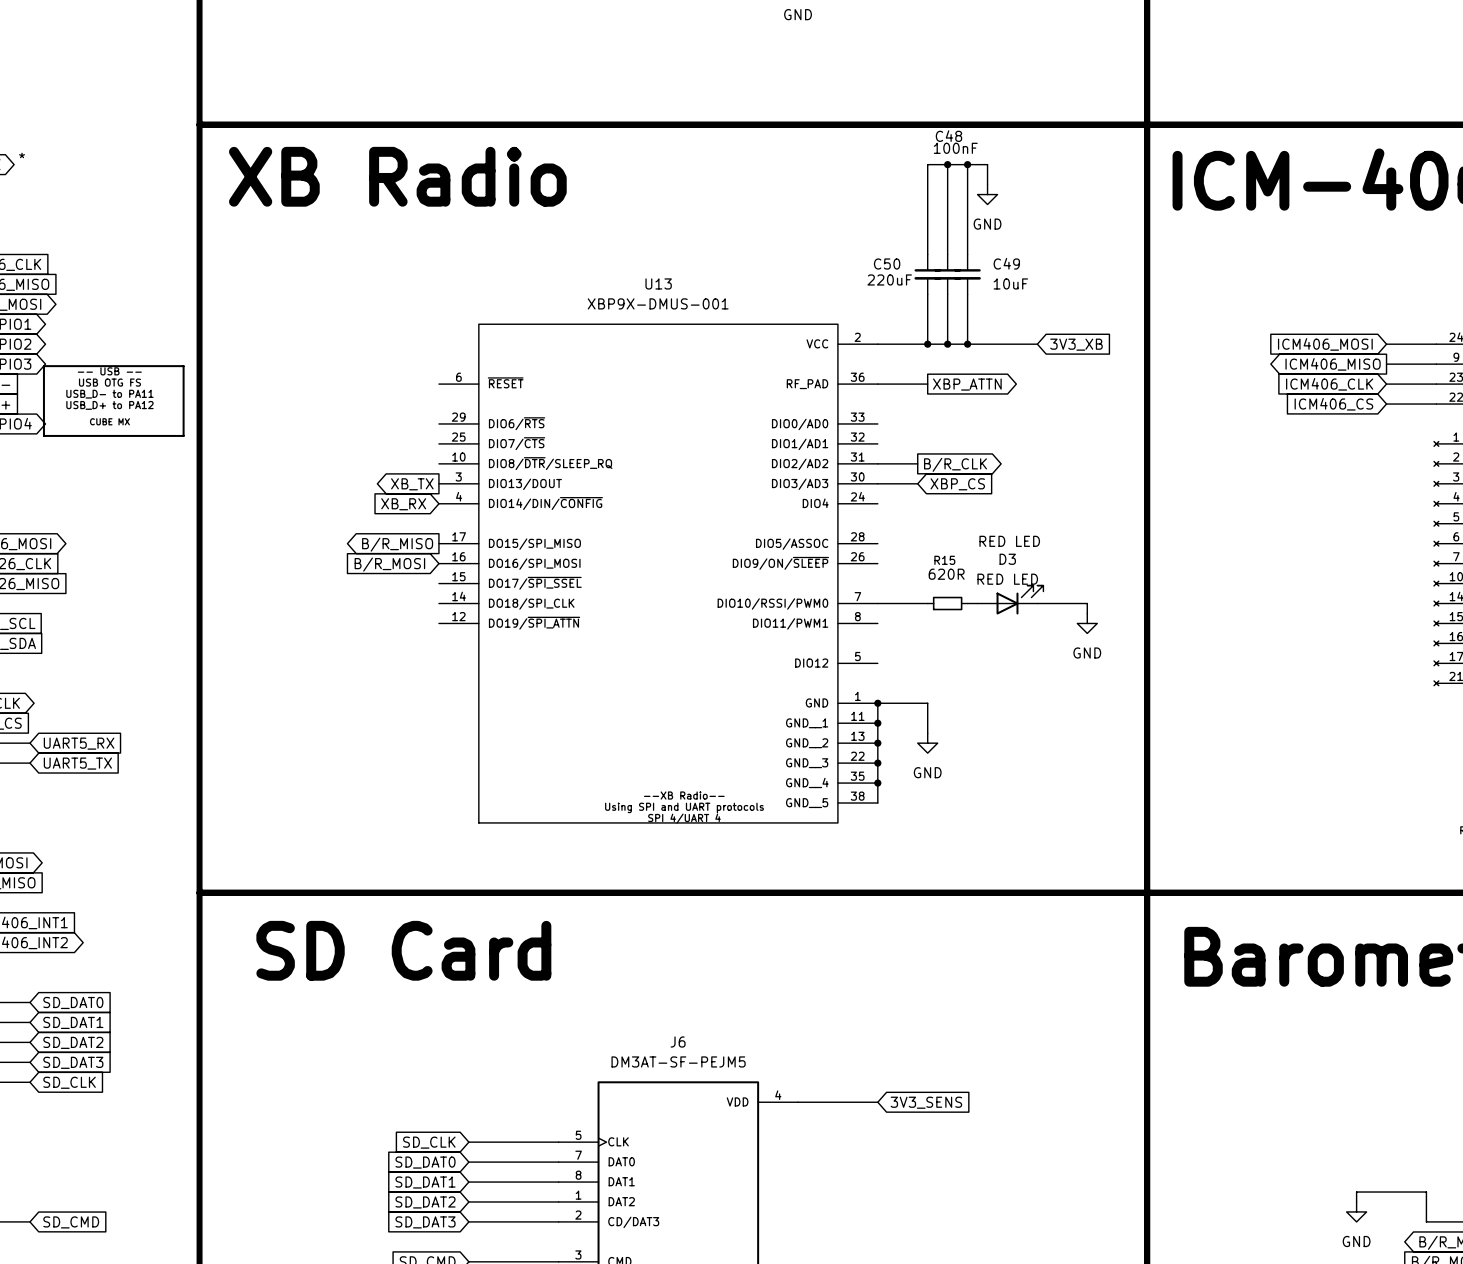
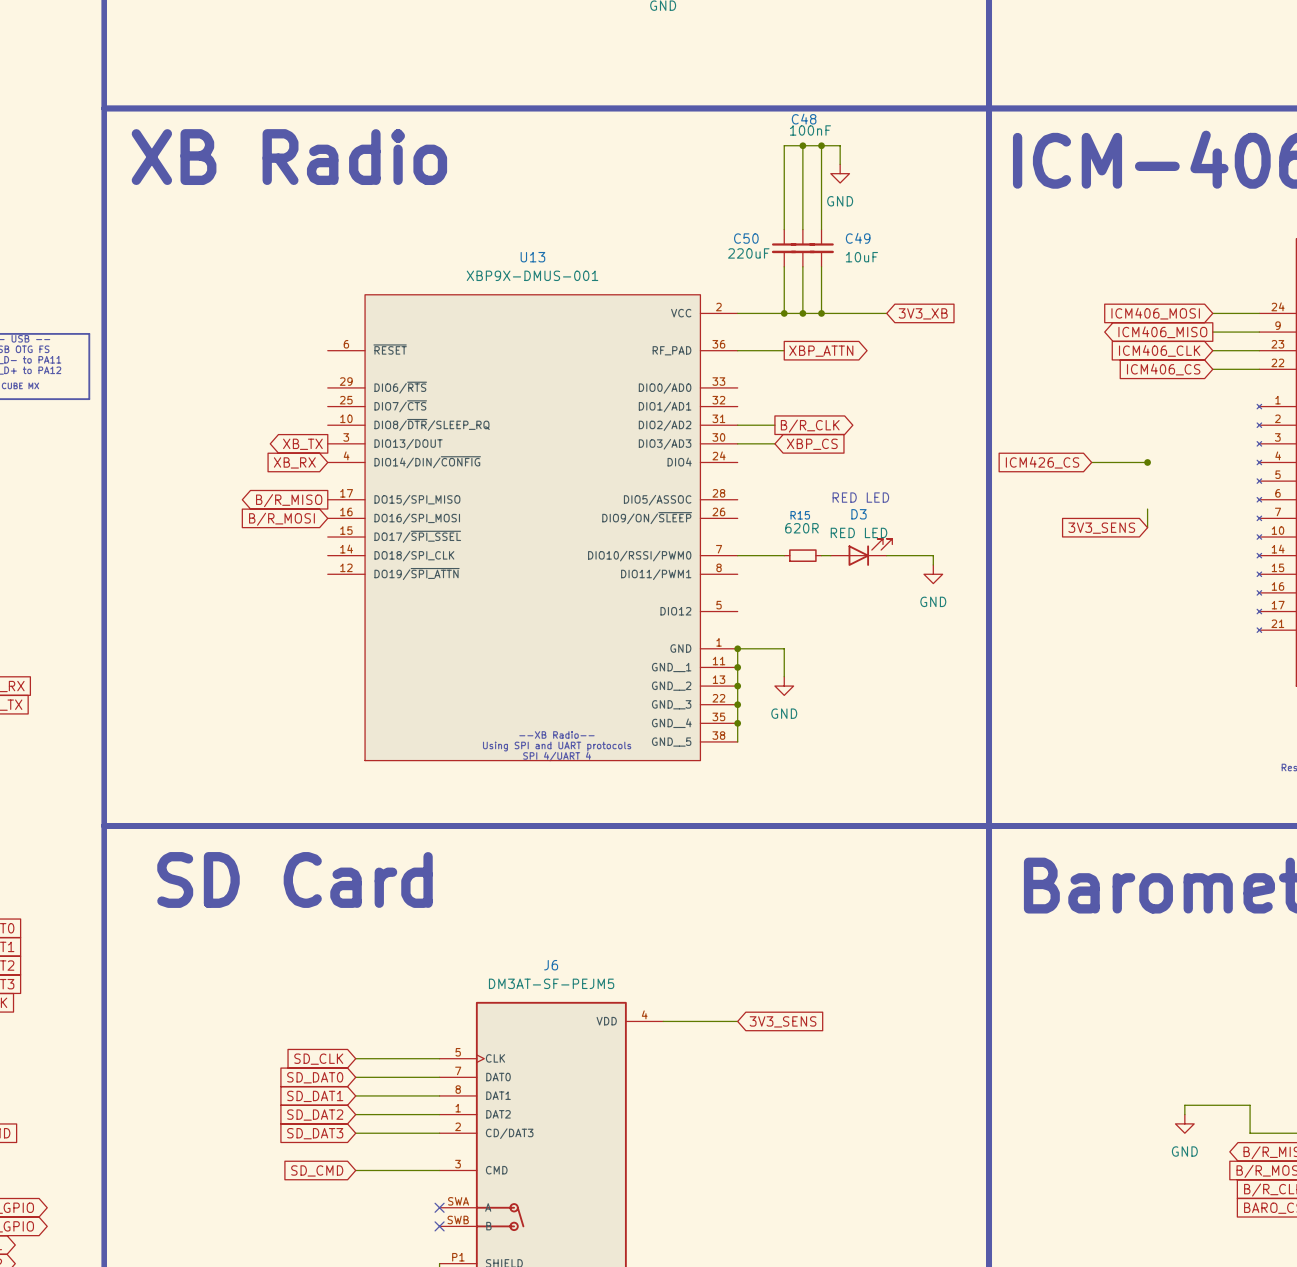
wire: none -> (1091, 462) (1147, 462)
junction: none -> (1147, 462)
global label: none -> ICM426_CS (1042, 462)
wire: none -> (1147, 509) (1147, 527)
global label: none -> 3V3_SENS (1101, 528)

